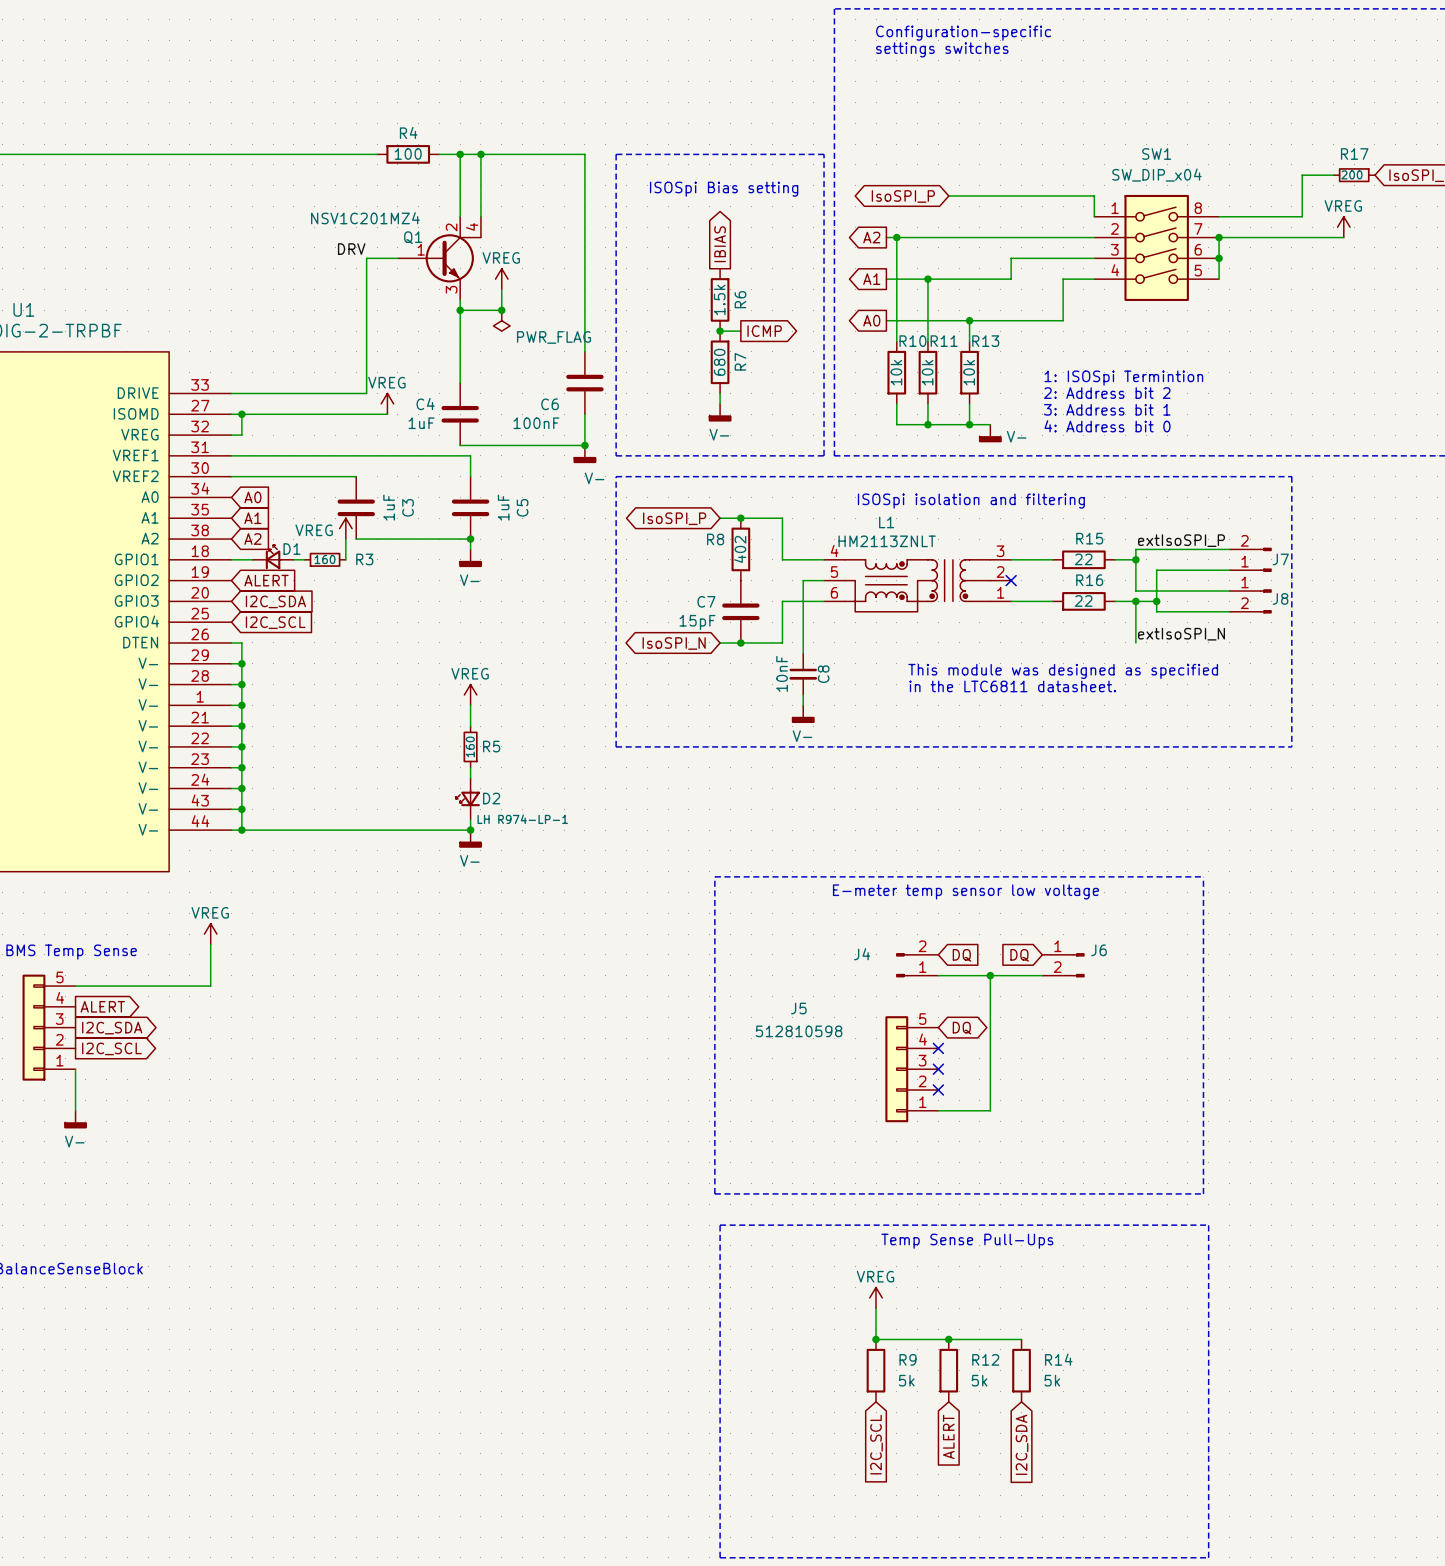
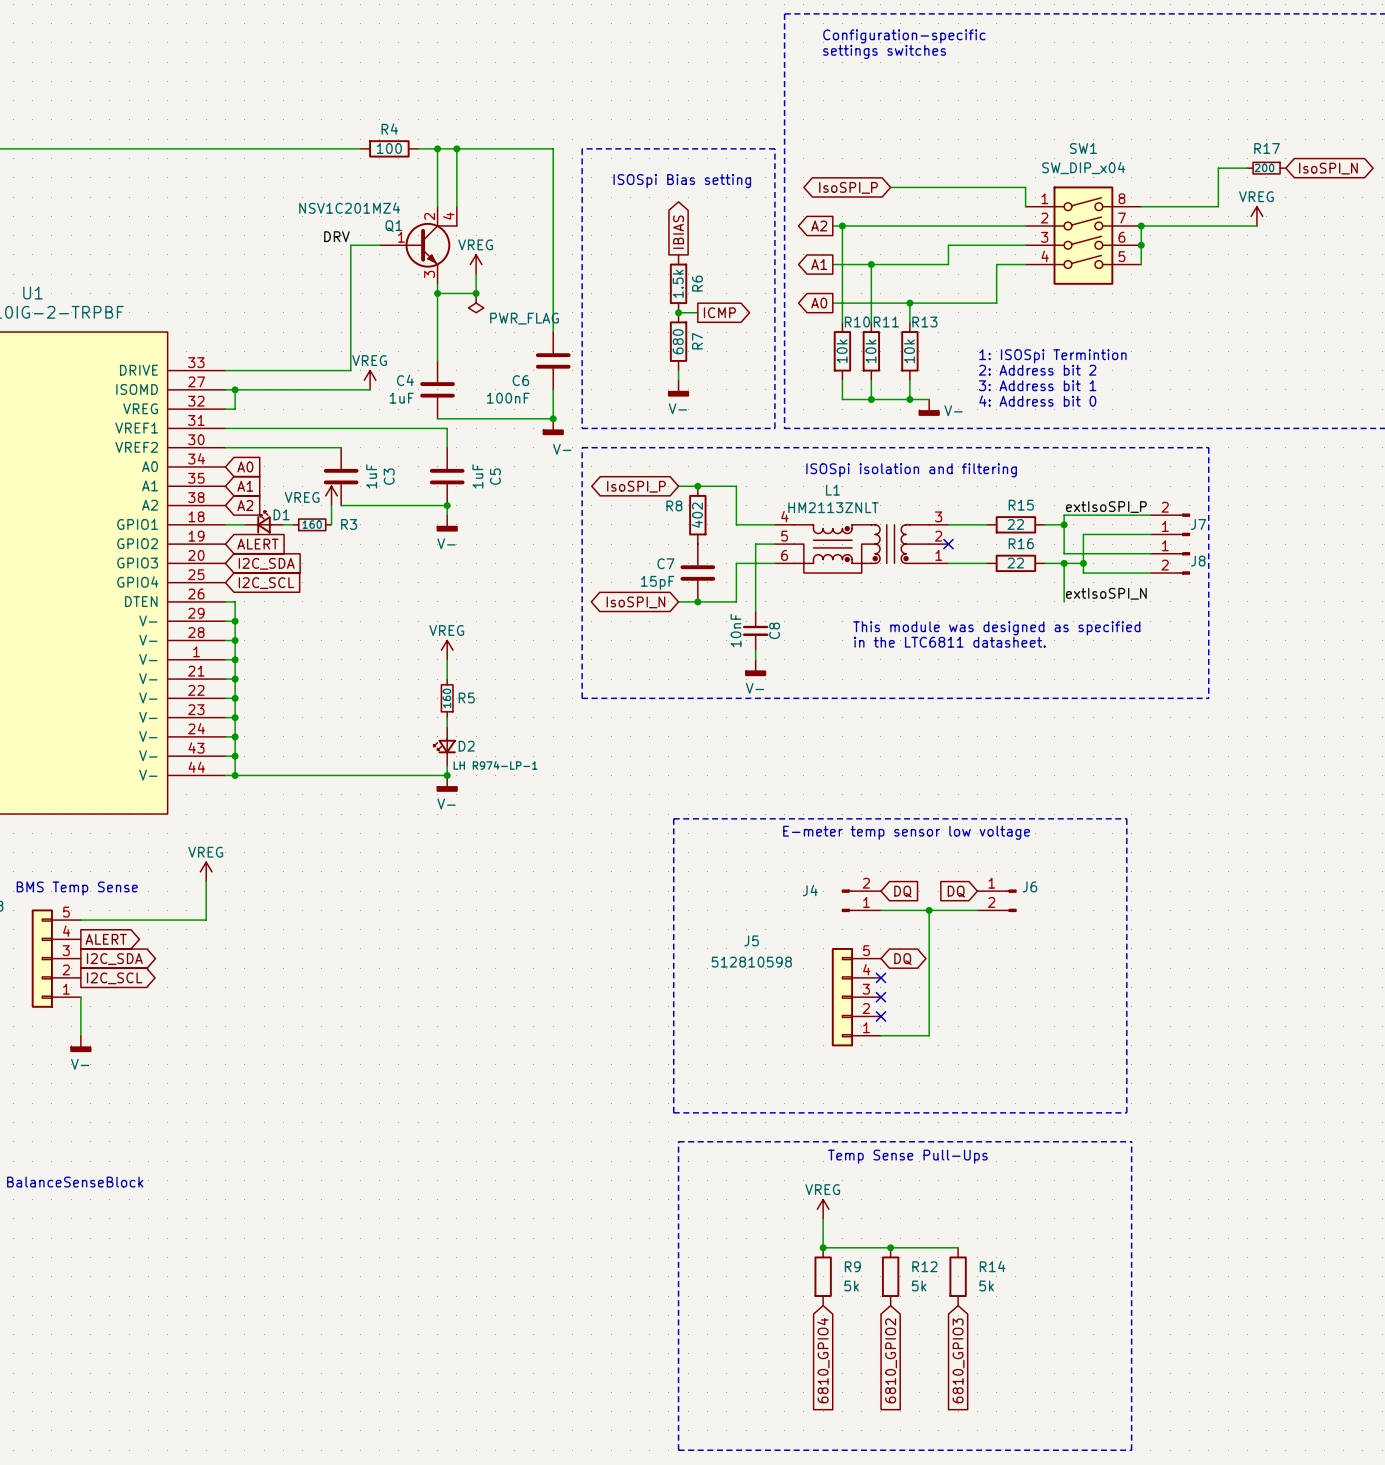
global label: ALERT (948, 1436) -> 6810_GPIO2 (891, 1360)
global label: I2C_SCL (876, 1444) -> 6810_GPIO4 (823, 1360)
global label: I2C_SDA (1022, 1444) -> 6810_GPIO3 (958, 1360)

